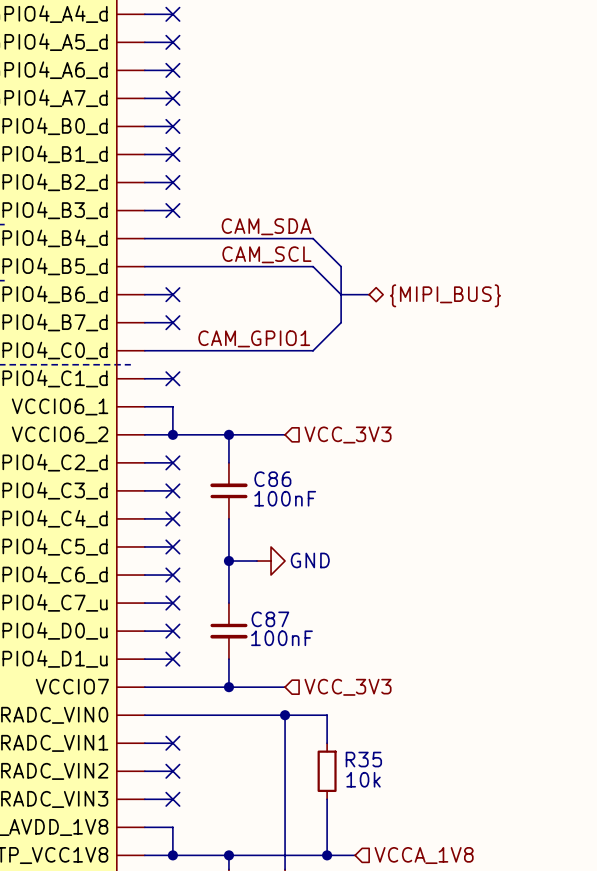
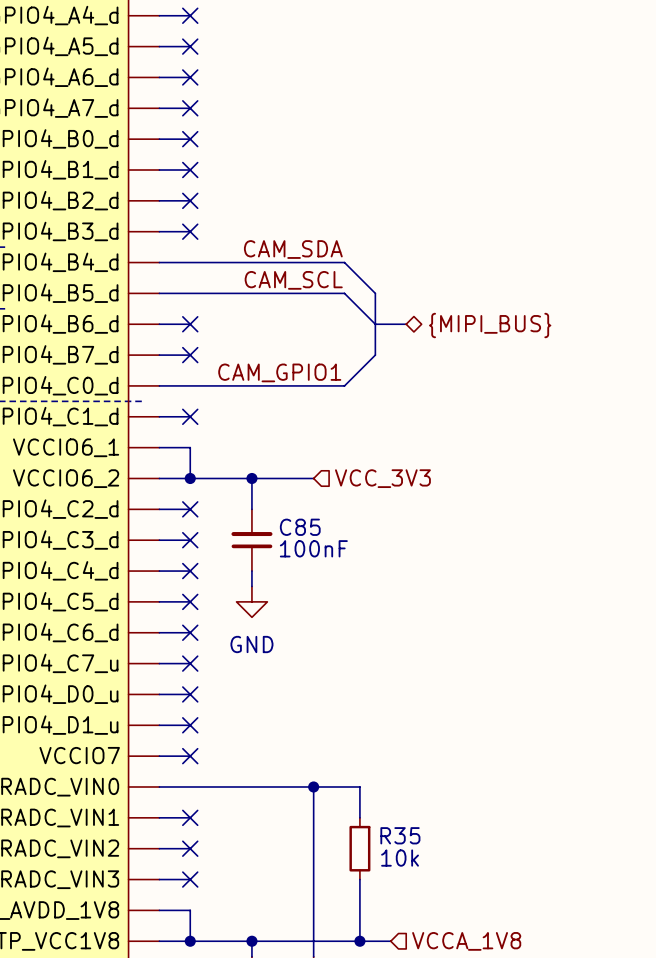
C86 name: C86 (272, 479) -> C85 (300, 527)
wire: (228, 532) (228, 603) -> none
wire: (228, 561) (257, 561) -> none
junction: (228, 561) -> none
power symbol rotation: 0° (271, 561) -> 90° clockwise (251, 601)
power symbol position: GND (271, 561) -> GND (251, 601)
C87: 100nF (228, 631) -> none
wire: (228, 659) (228, 687) -> none
wire: (172, 687) (285, 687) -> none
no-connect mark: none -> (190, 756)
junction: (228, 687) -> none
hierarchical label: VCC_3V3 (348, 687) -> none

